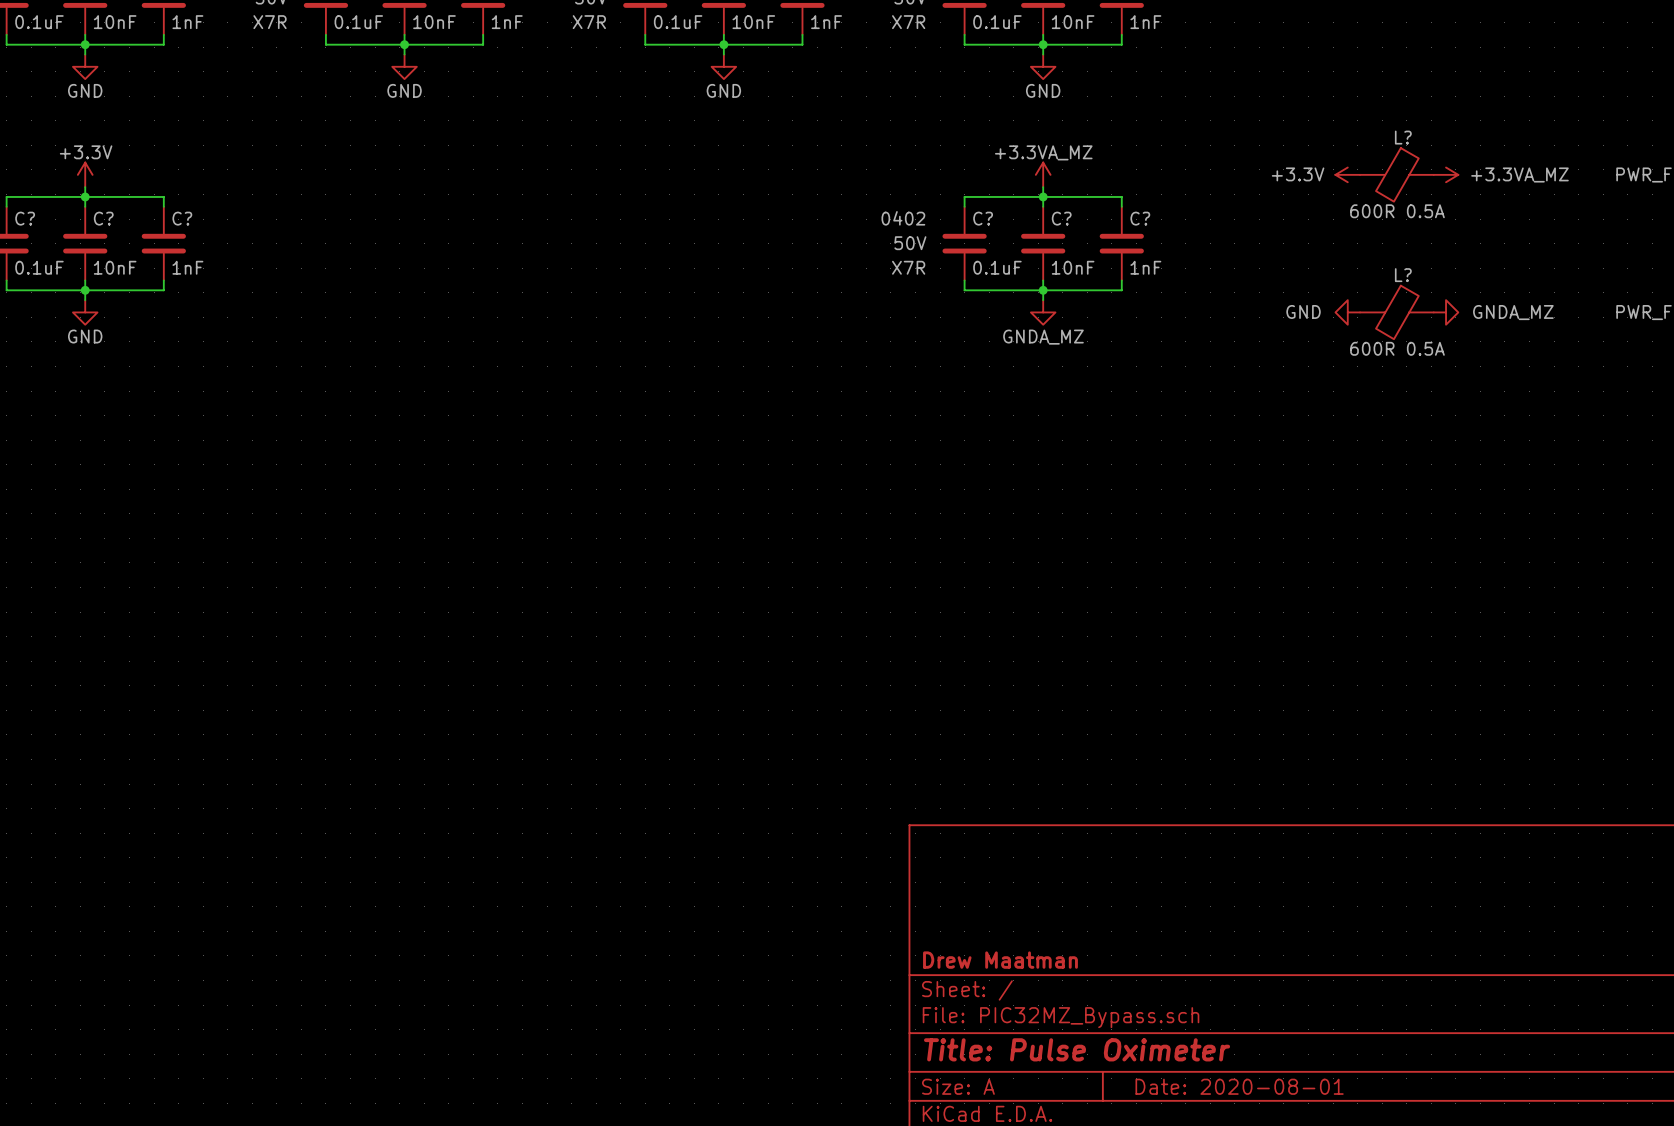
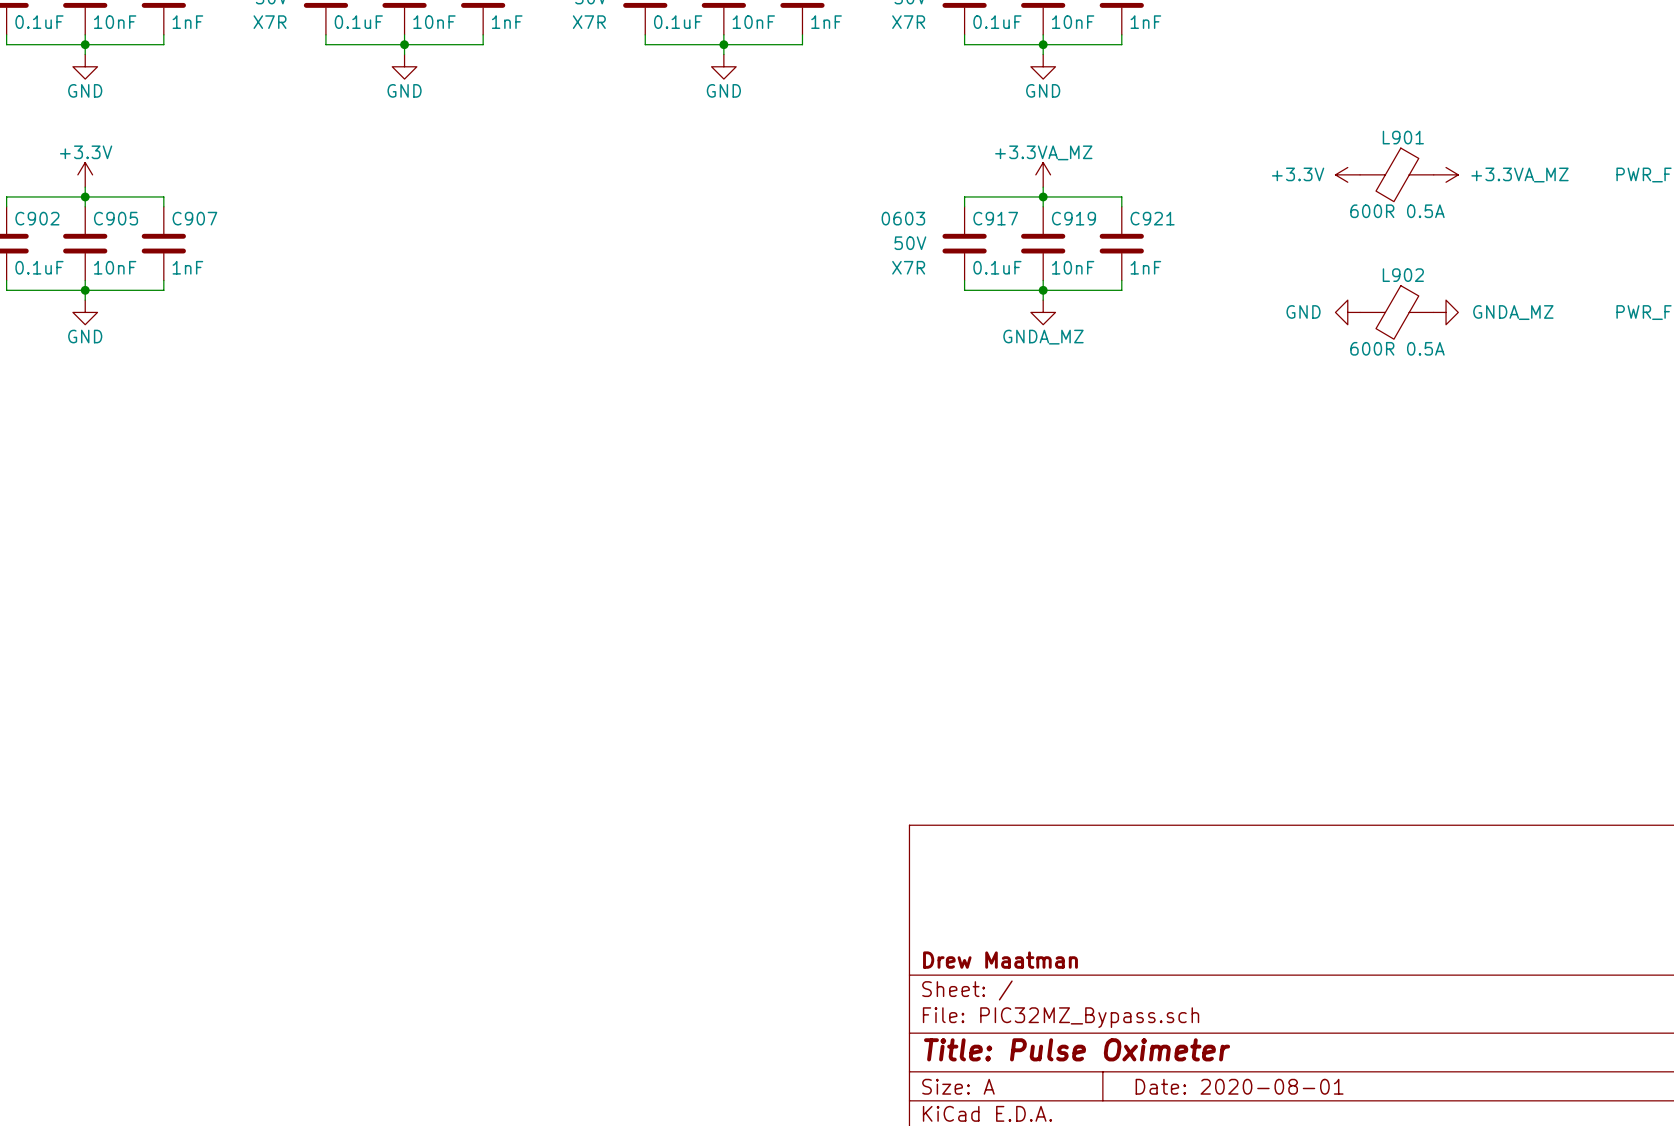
L? name: L? (1403, 137) -> L901 (1403, 137)
C? name: C? (25, 218) -> C902 (37, 218)
C? name: C? (103, 218) -> C905 (116, 218)
C? name: C? (182, 218) -> C907 (194, 218)
C? text: 0402 (903, 218) -> 0603 (903, 218)
C? name: C? (983, 218) -> C917 (995, 218)
C? name: C? (1061, 218) -> C919 (1073, 218)
C? name: C? (1140, 218) -> C921 (1152, 218)
L? name: L? (1403, 275) -> L902 (1403, 275)

